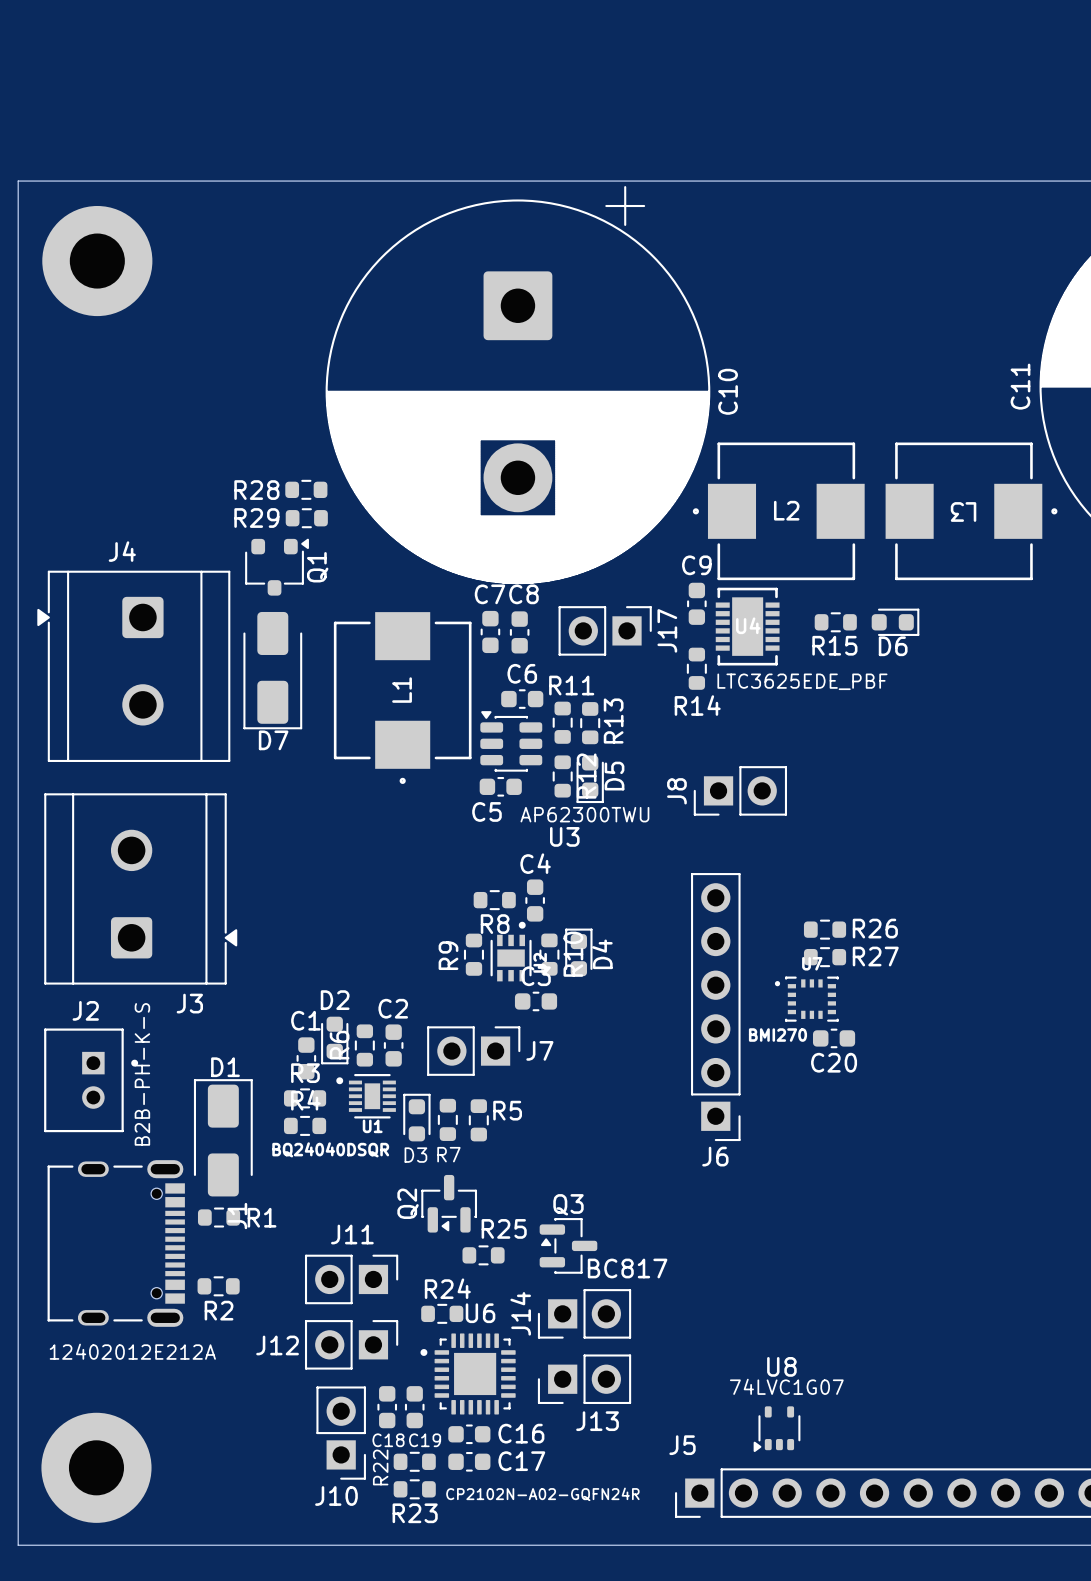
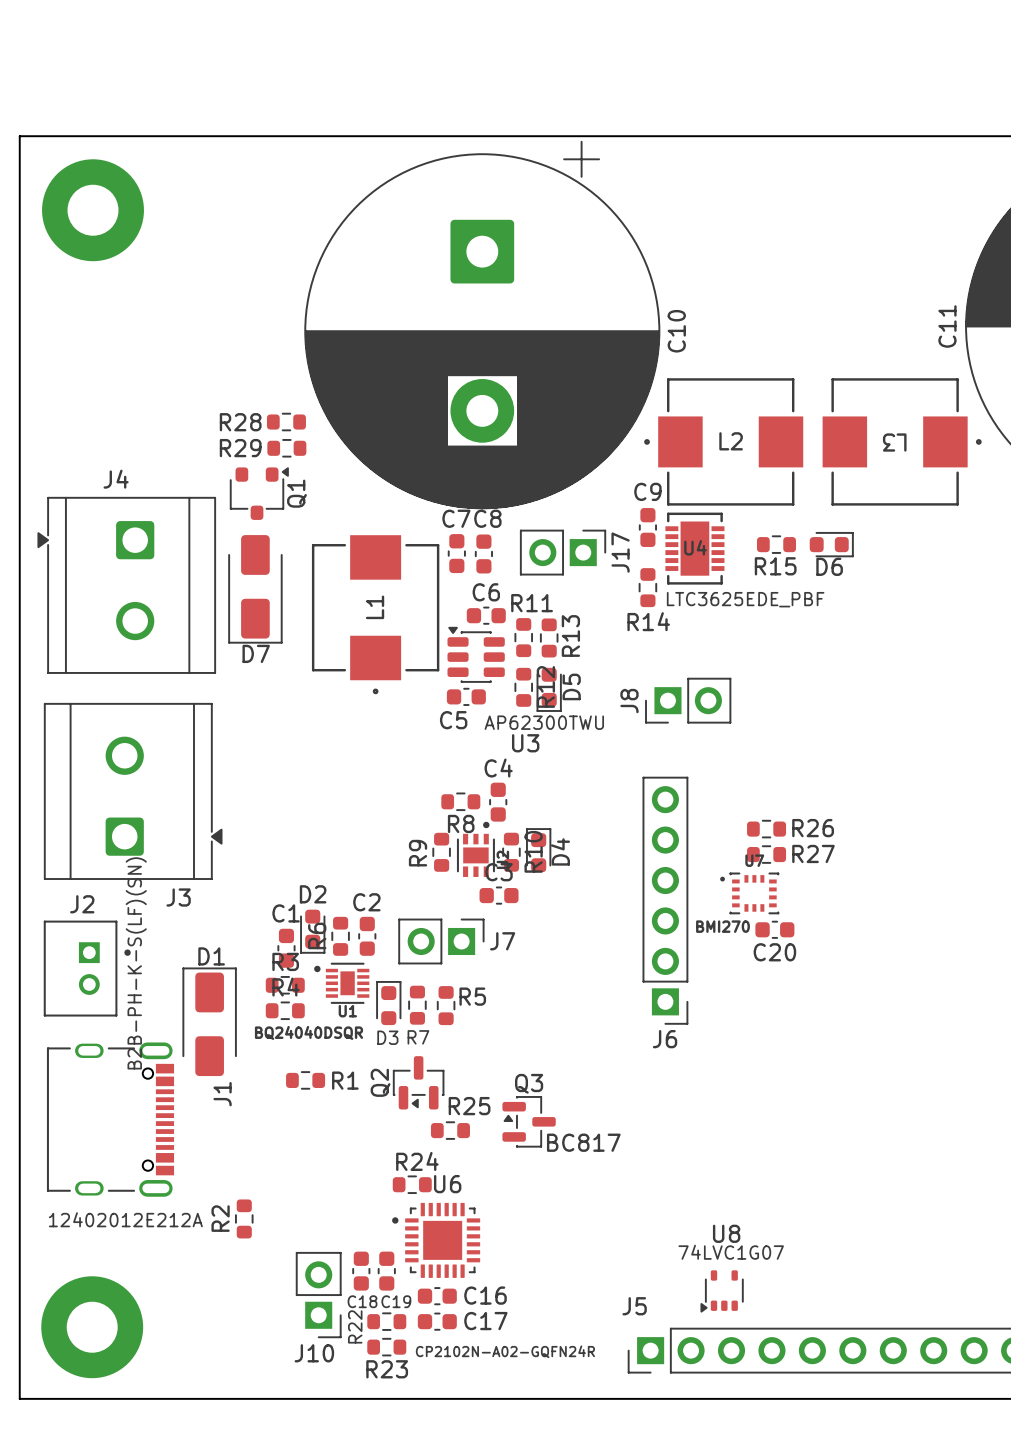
J2 value: B2B-PH-K-S (142, 1074) -> B2B-PH-K-S(LF)(SN) (136, 963)
R1 position: (219, 1217) -> (305, 1080)
J11: (351, 1279) -> none
R2 rotation: 0° (218, 1286) -> 90° clockwise (244, 1218)
R2 position: (218, 1286) -> (244, 1218)
J14: (584, 1313) -> none
J12: (351, 1344) -> none
J13: (584, 1379) -> none

